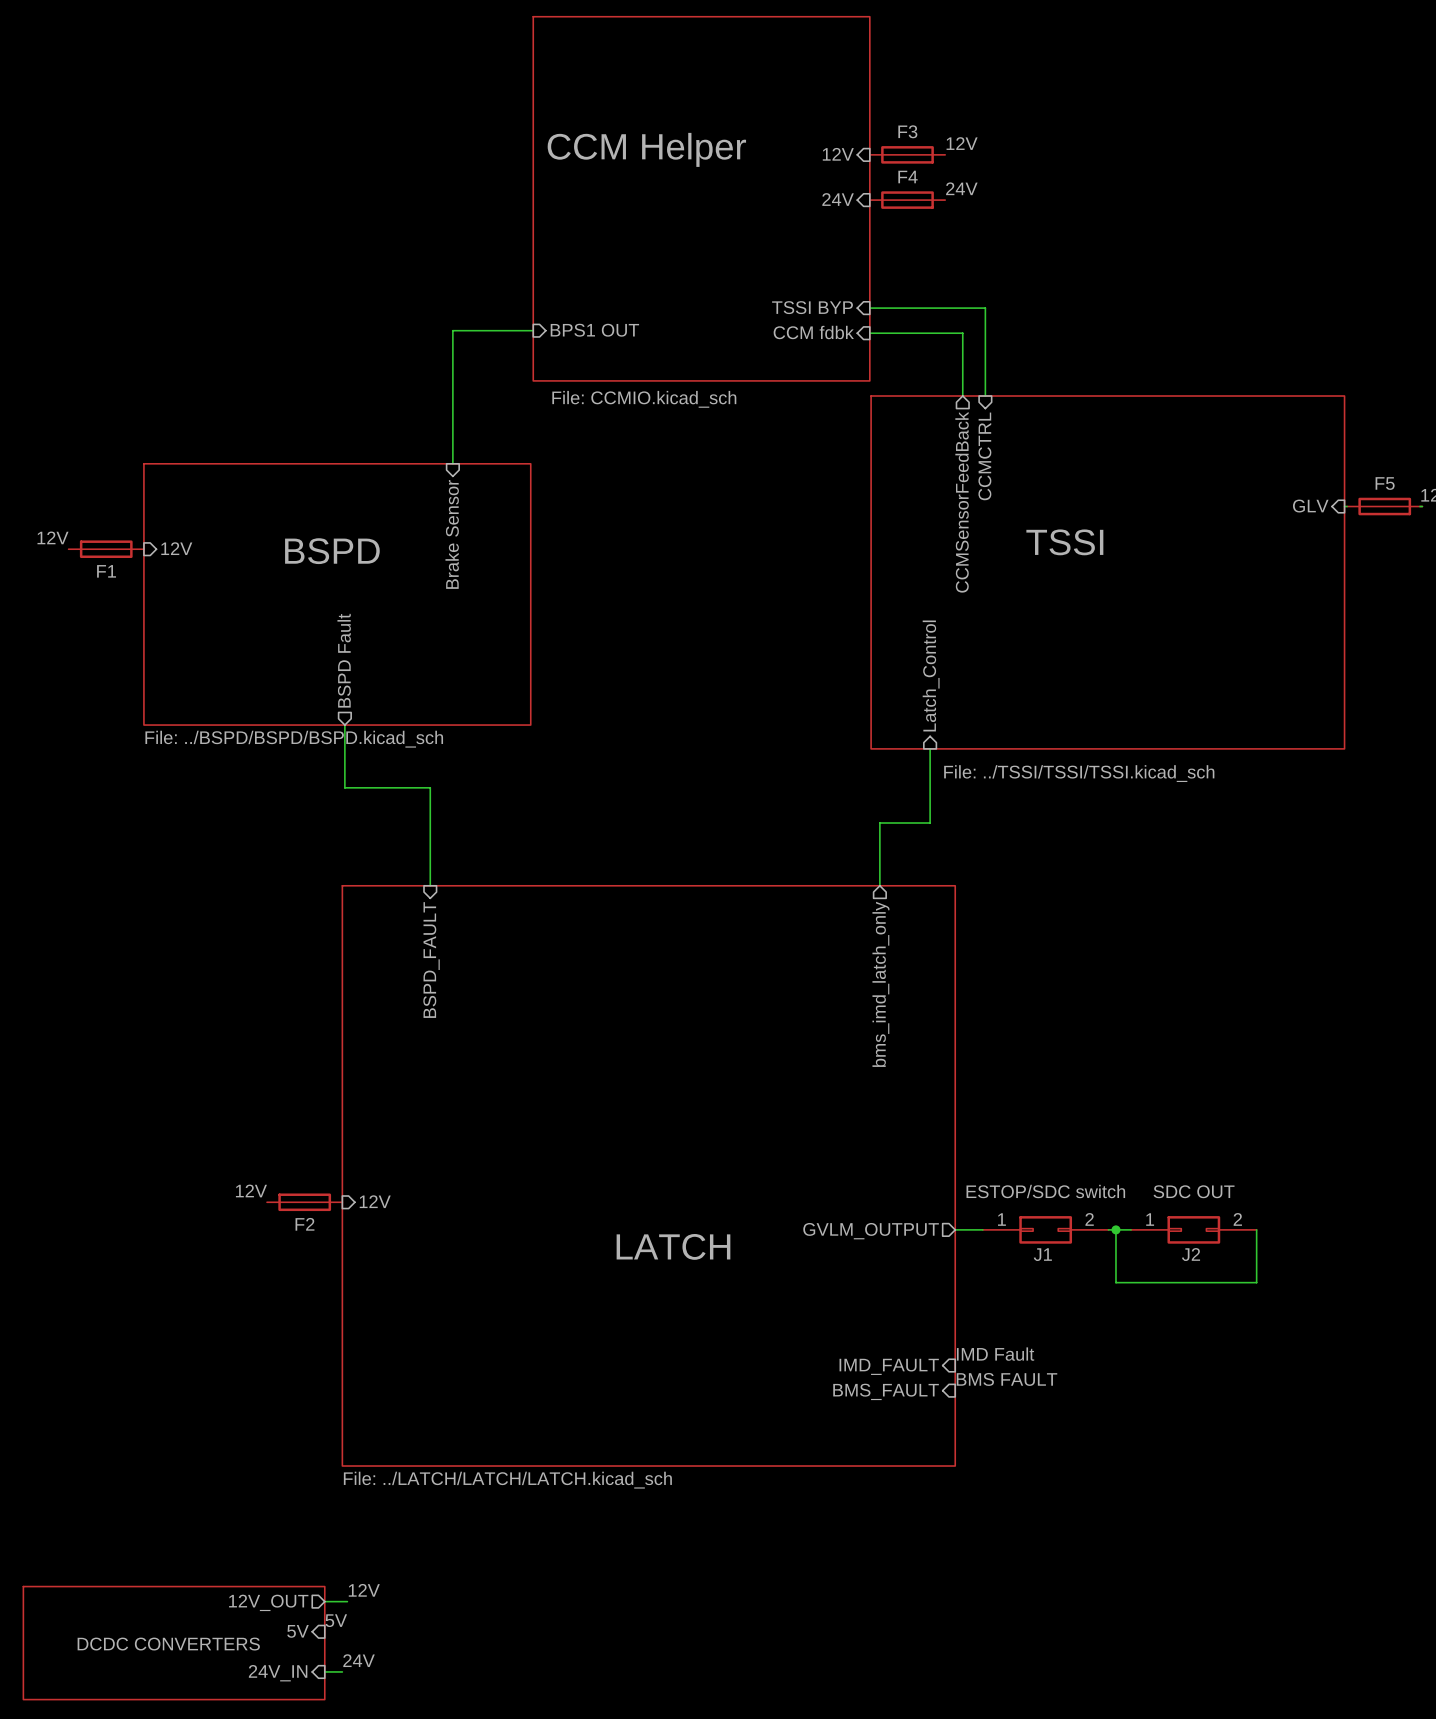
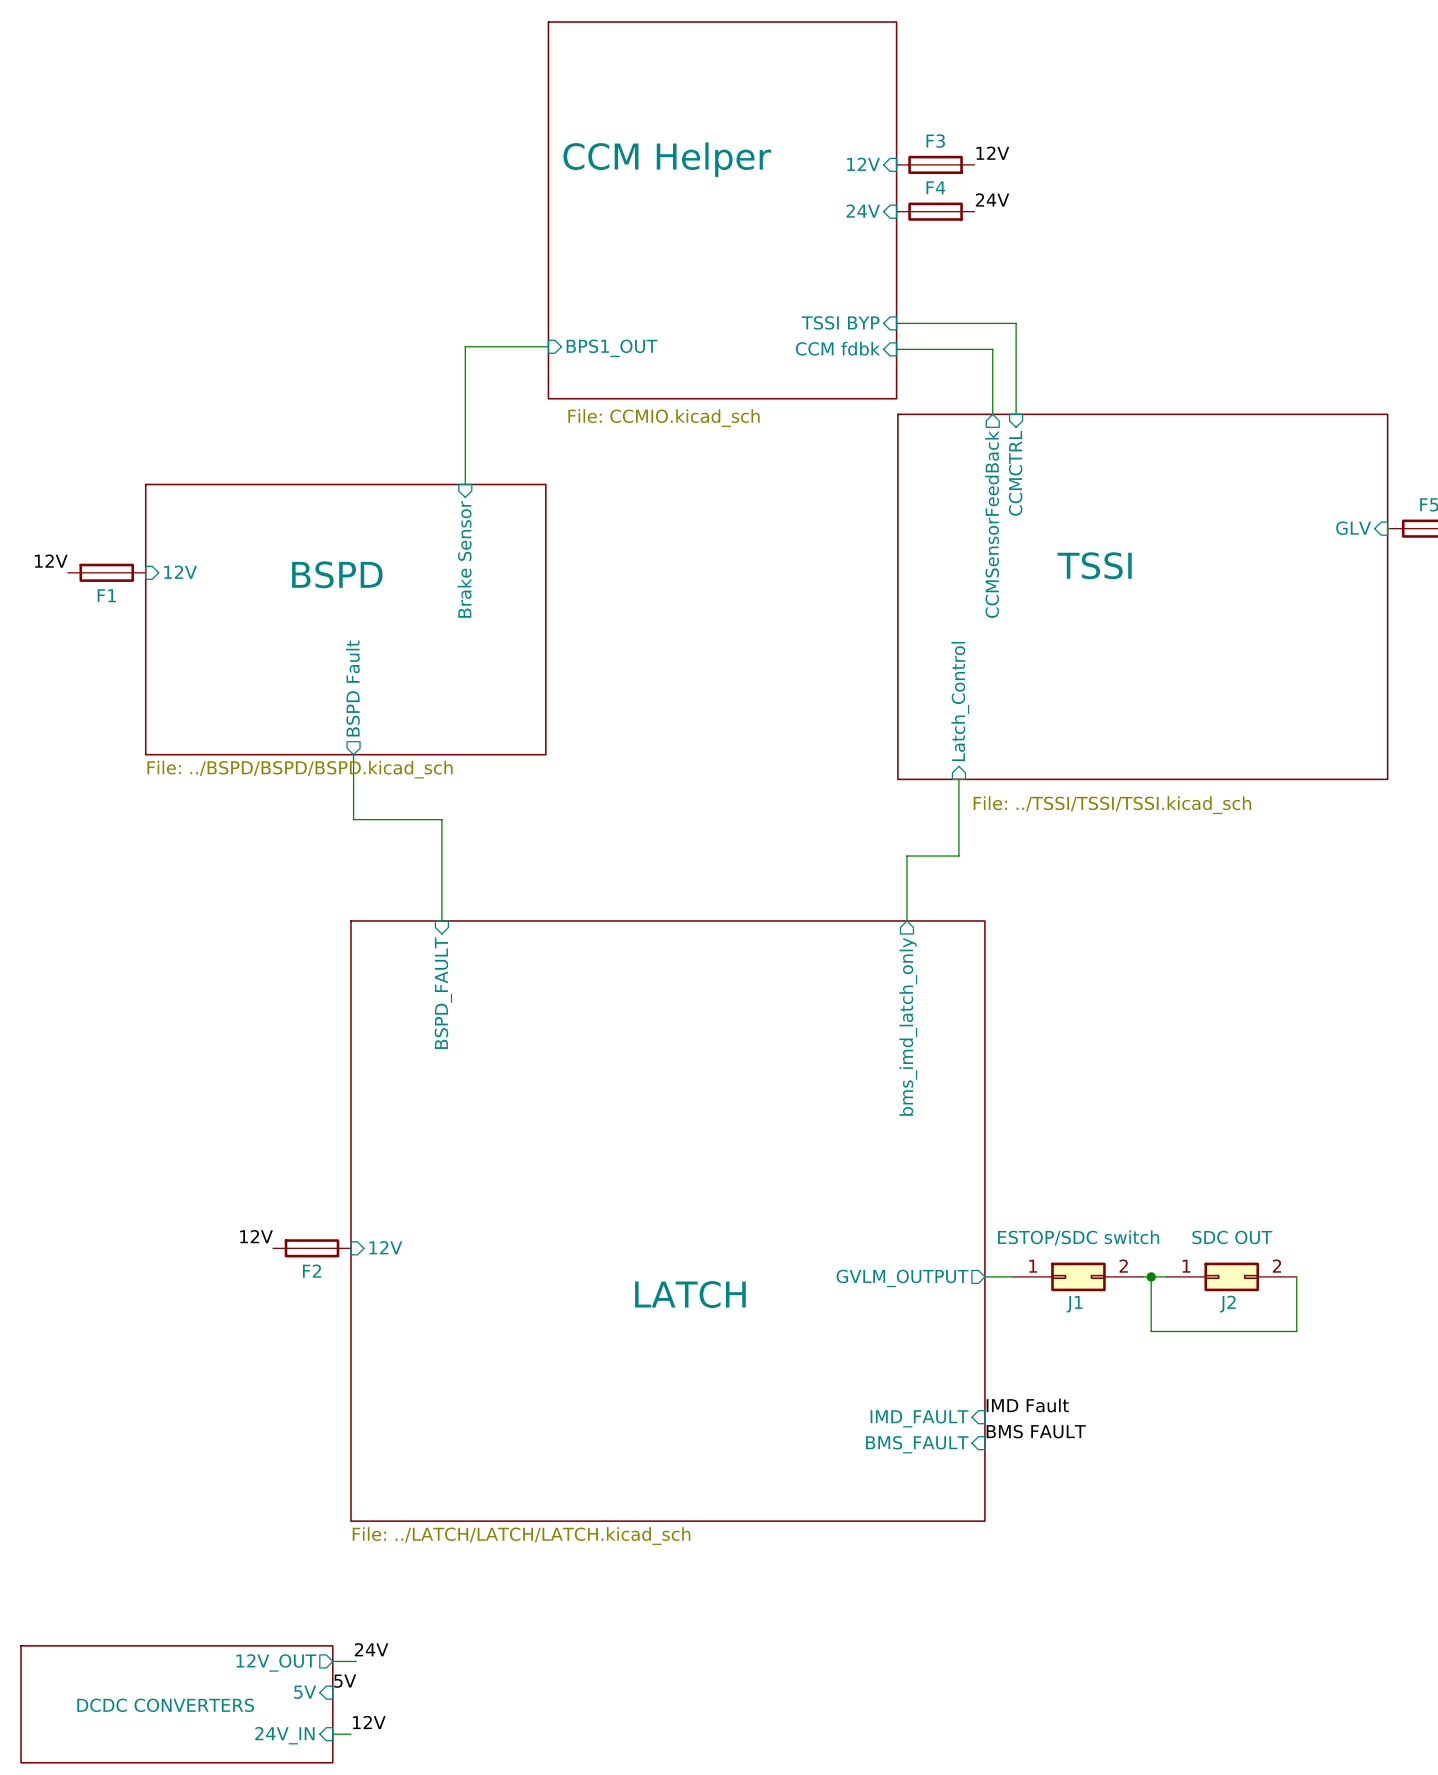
sheet pin: BPS1 OUT (594, 330) -> BPS1_OUT (612, 348)
label: 12V (364, 1590) -> 24V (371, 1649)
label: 24V (359, 1660) -> 12V (369, 1722)

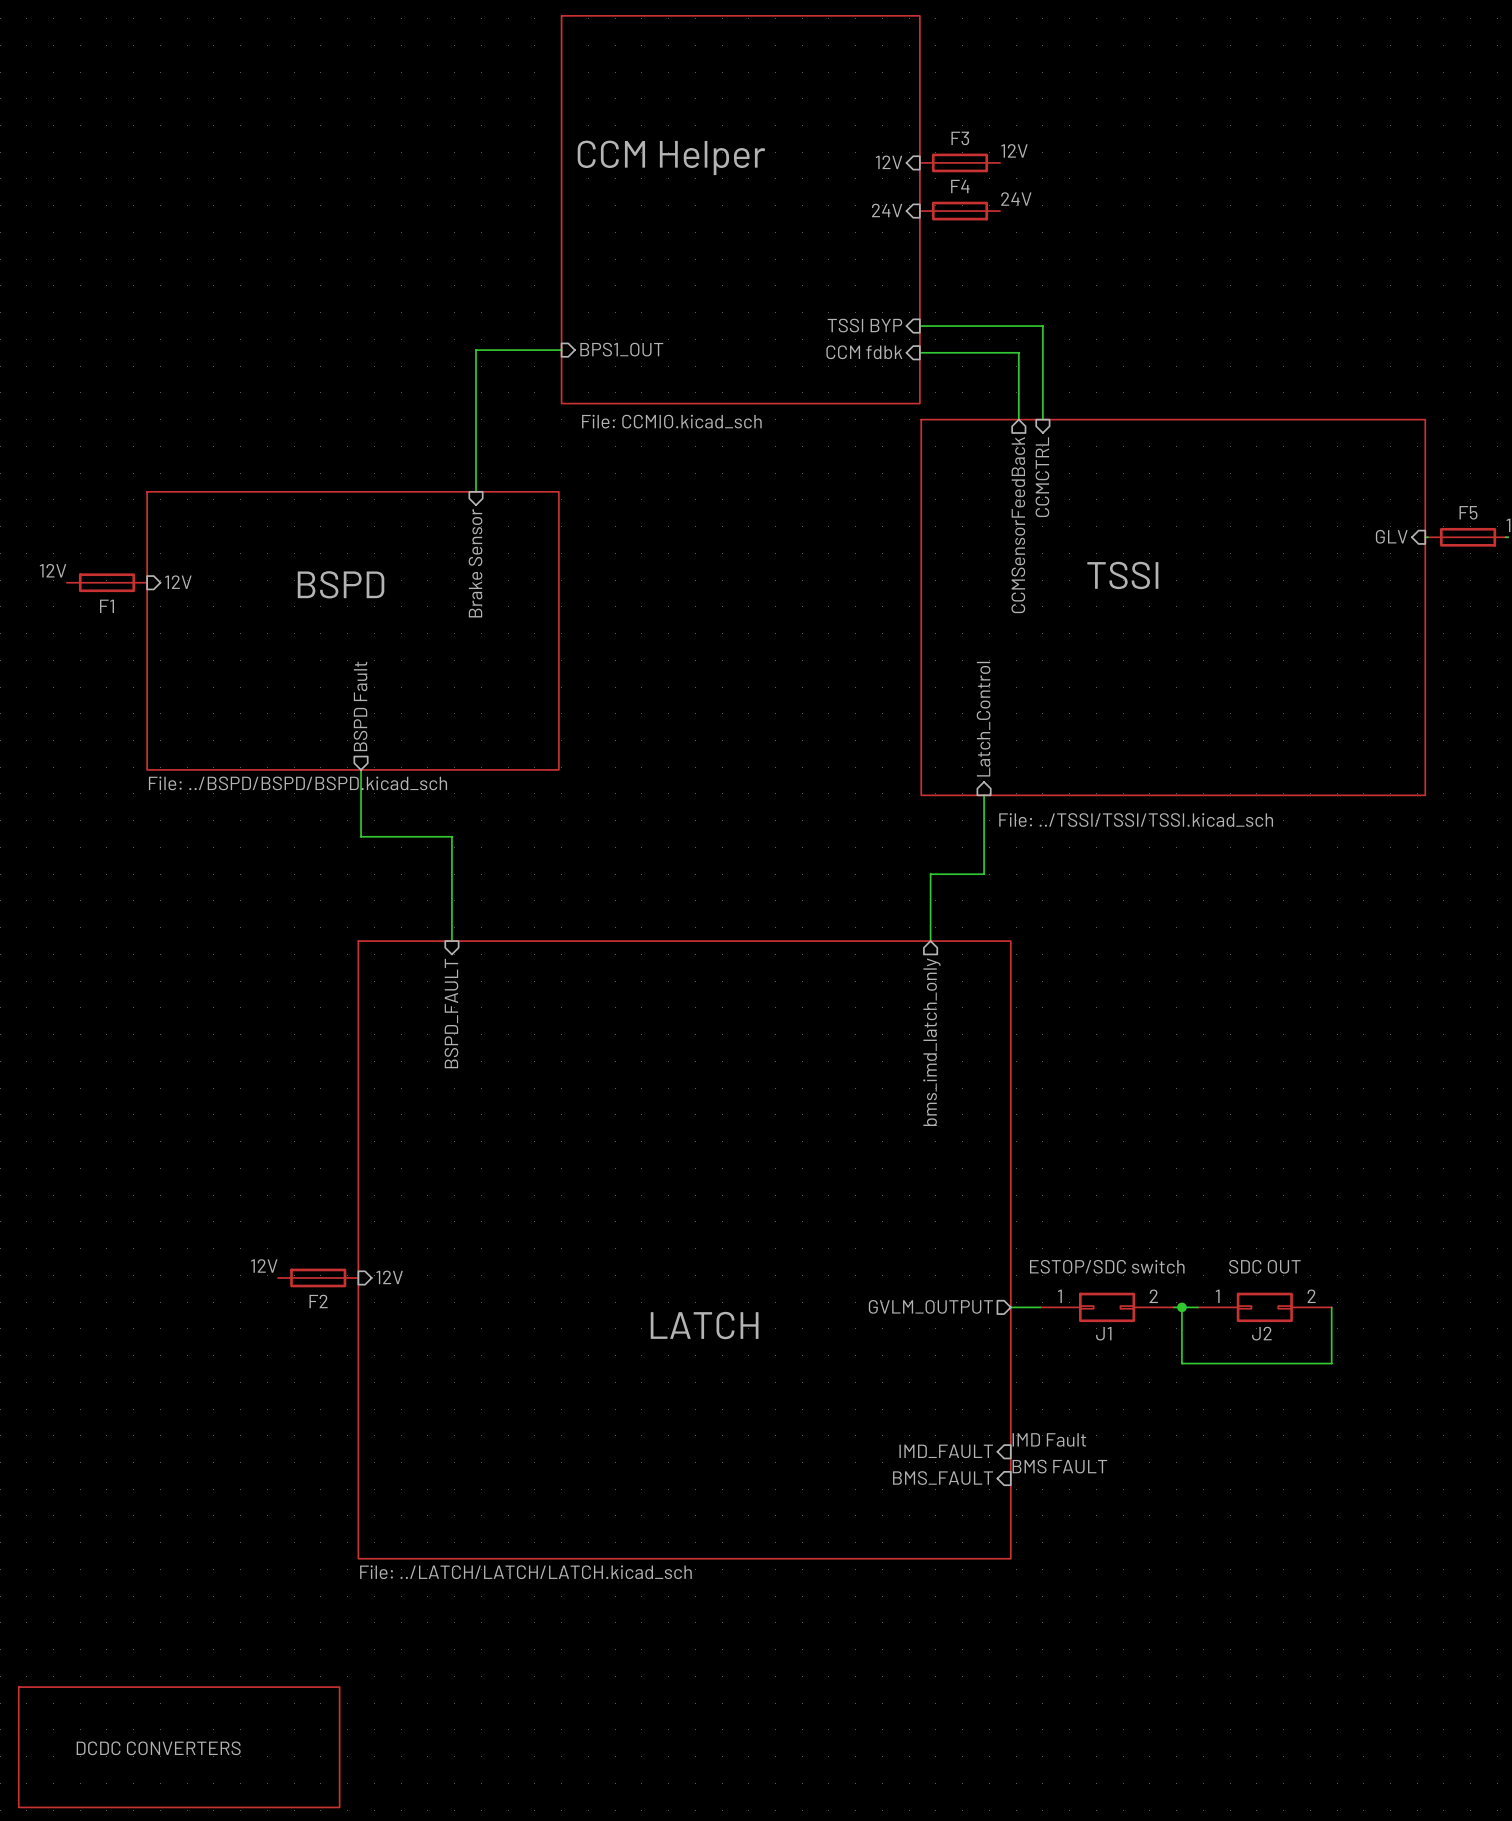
label: 24V (371, 1649) -> none
wire: (332, 1661) (356, 1661) -> none
sheet pin: 12V_OUT (276, 1662) -> none
label: 5V (345, 1681) -> none
sheet pin: 5V (305, 1692) -> none
label: 12V (369, 1722) -> none
wire: (332, 1734) (350, 1734) -> none
sheet pin: 24V_IN (284, 1735) -> none

